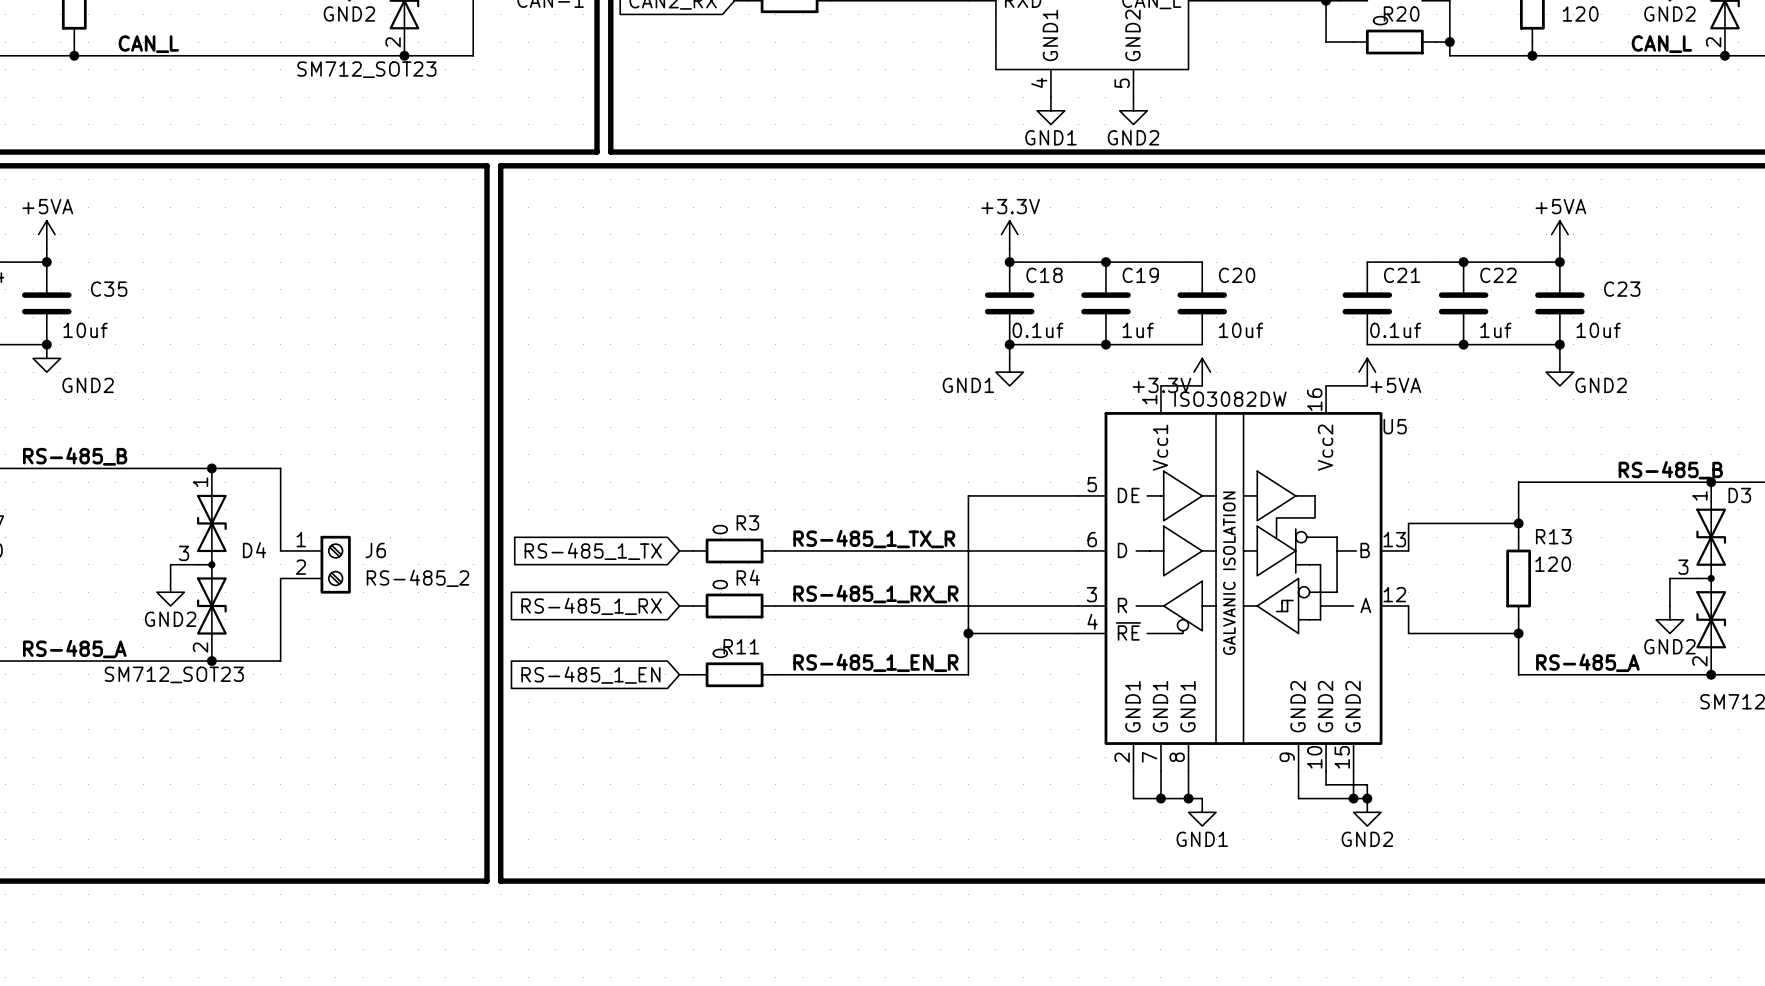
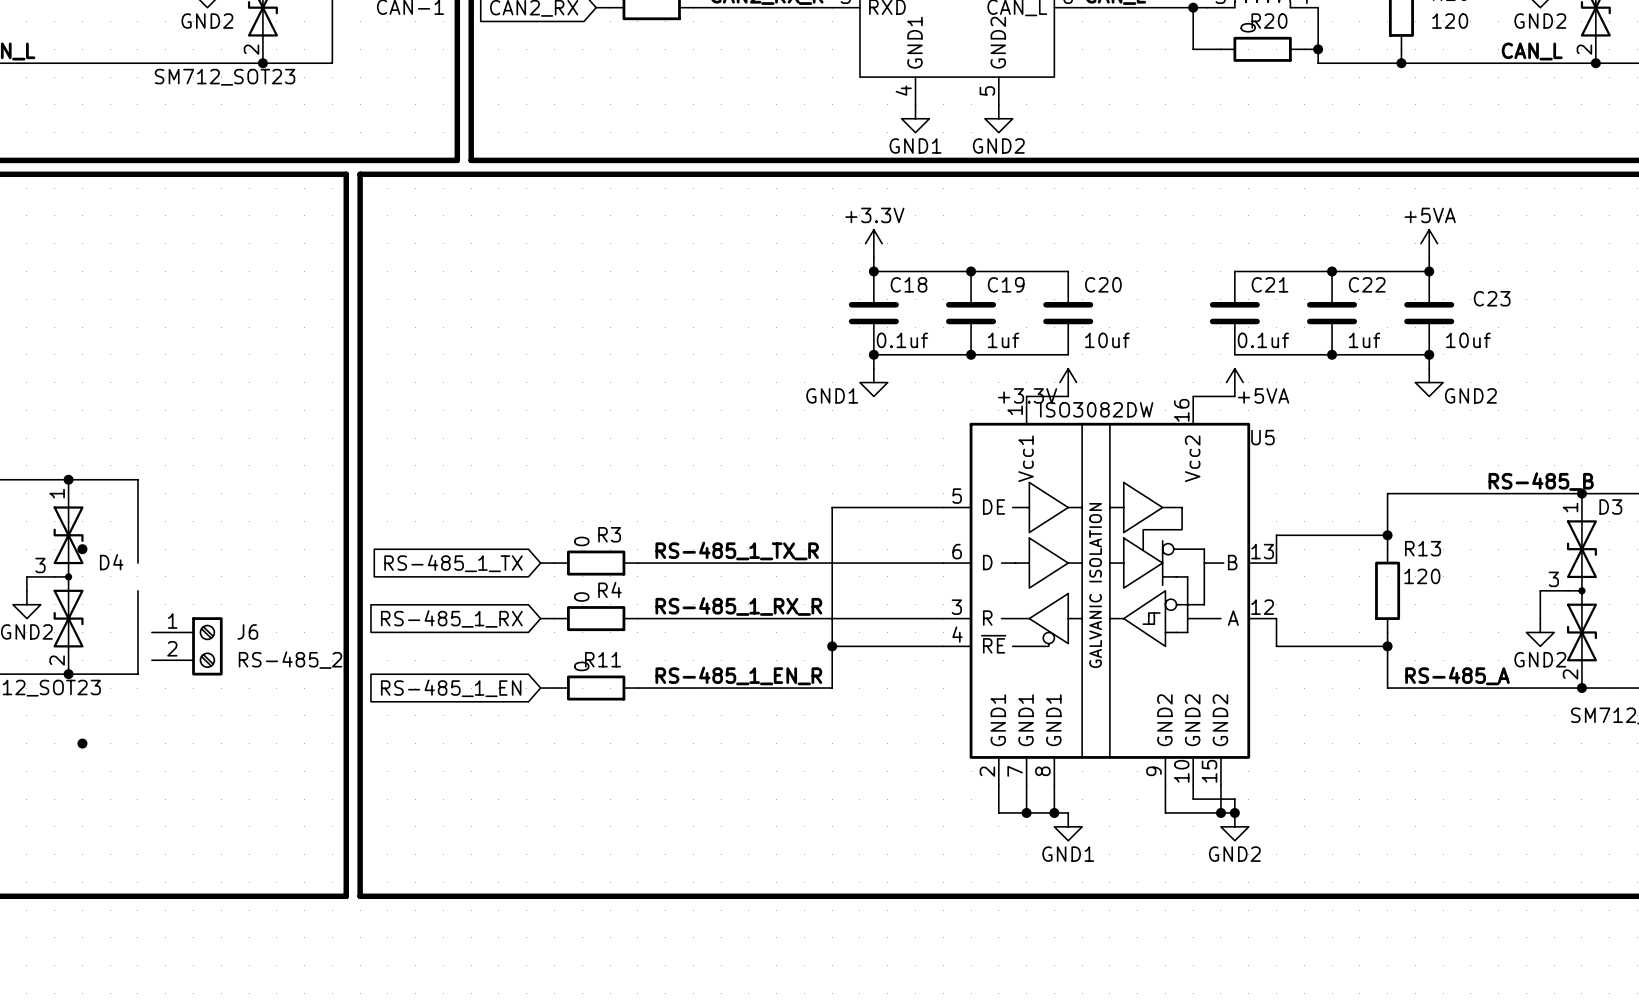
junction: none -> (82, 549)
J6 position: (315, 564) -> (187, 646)
junction: none -> (82, 743)

